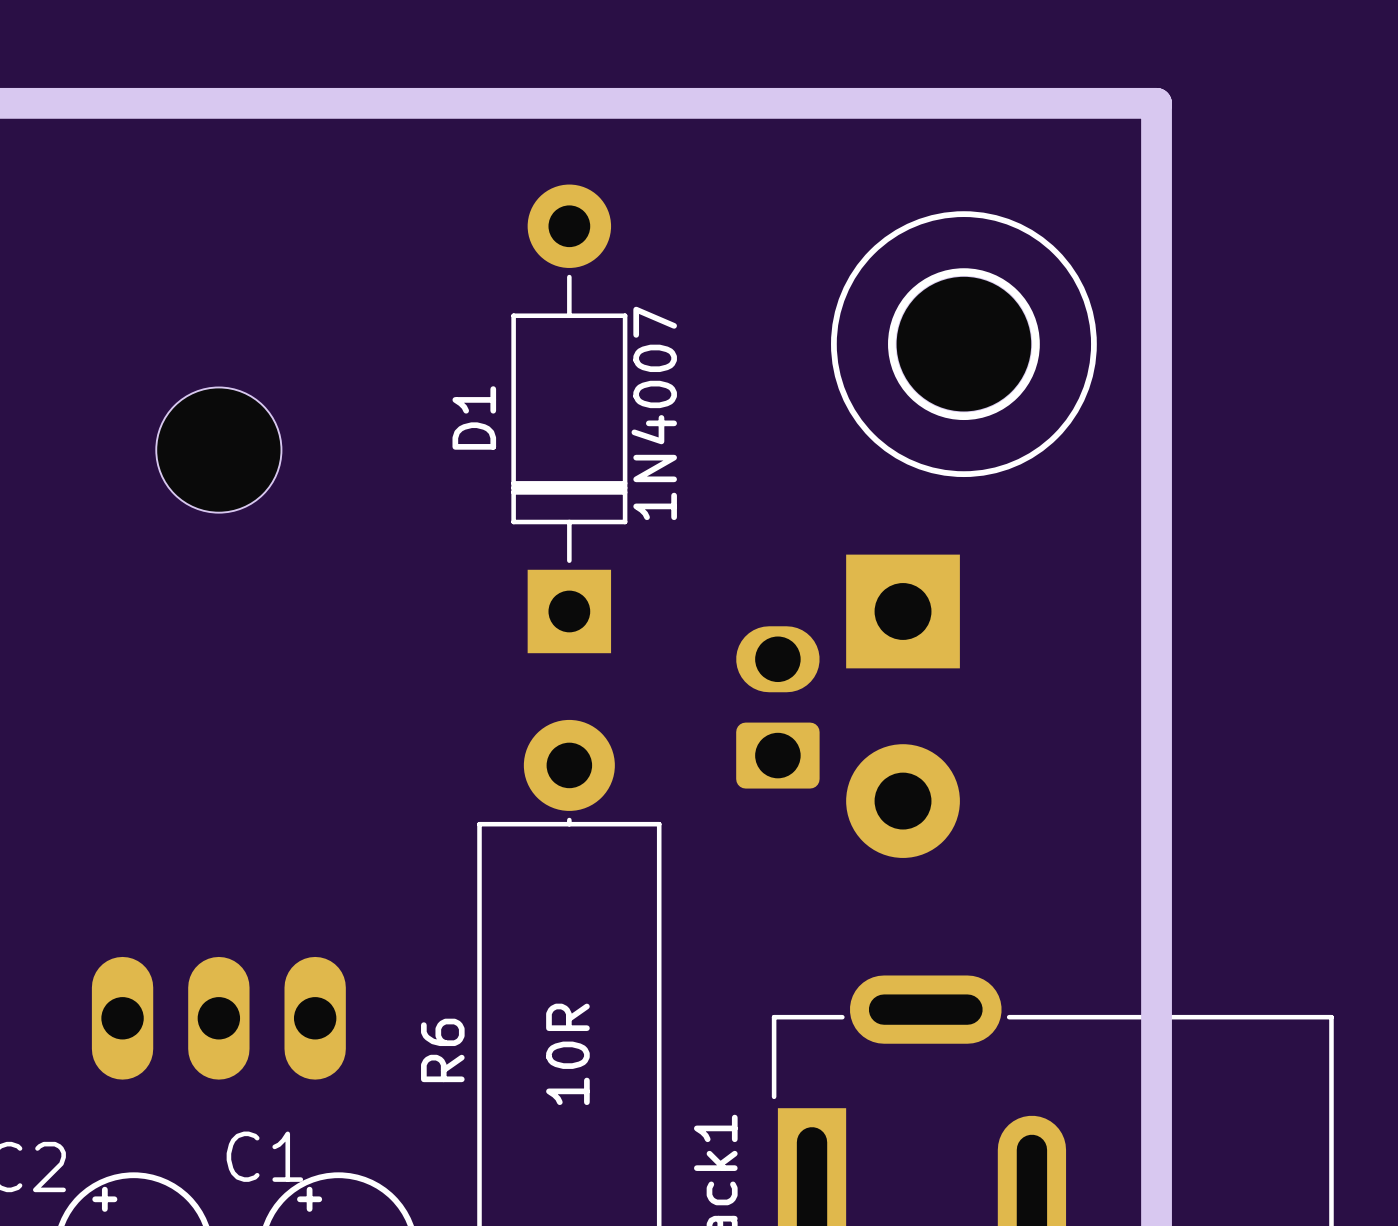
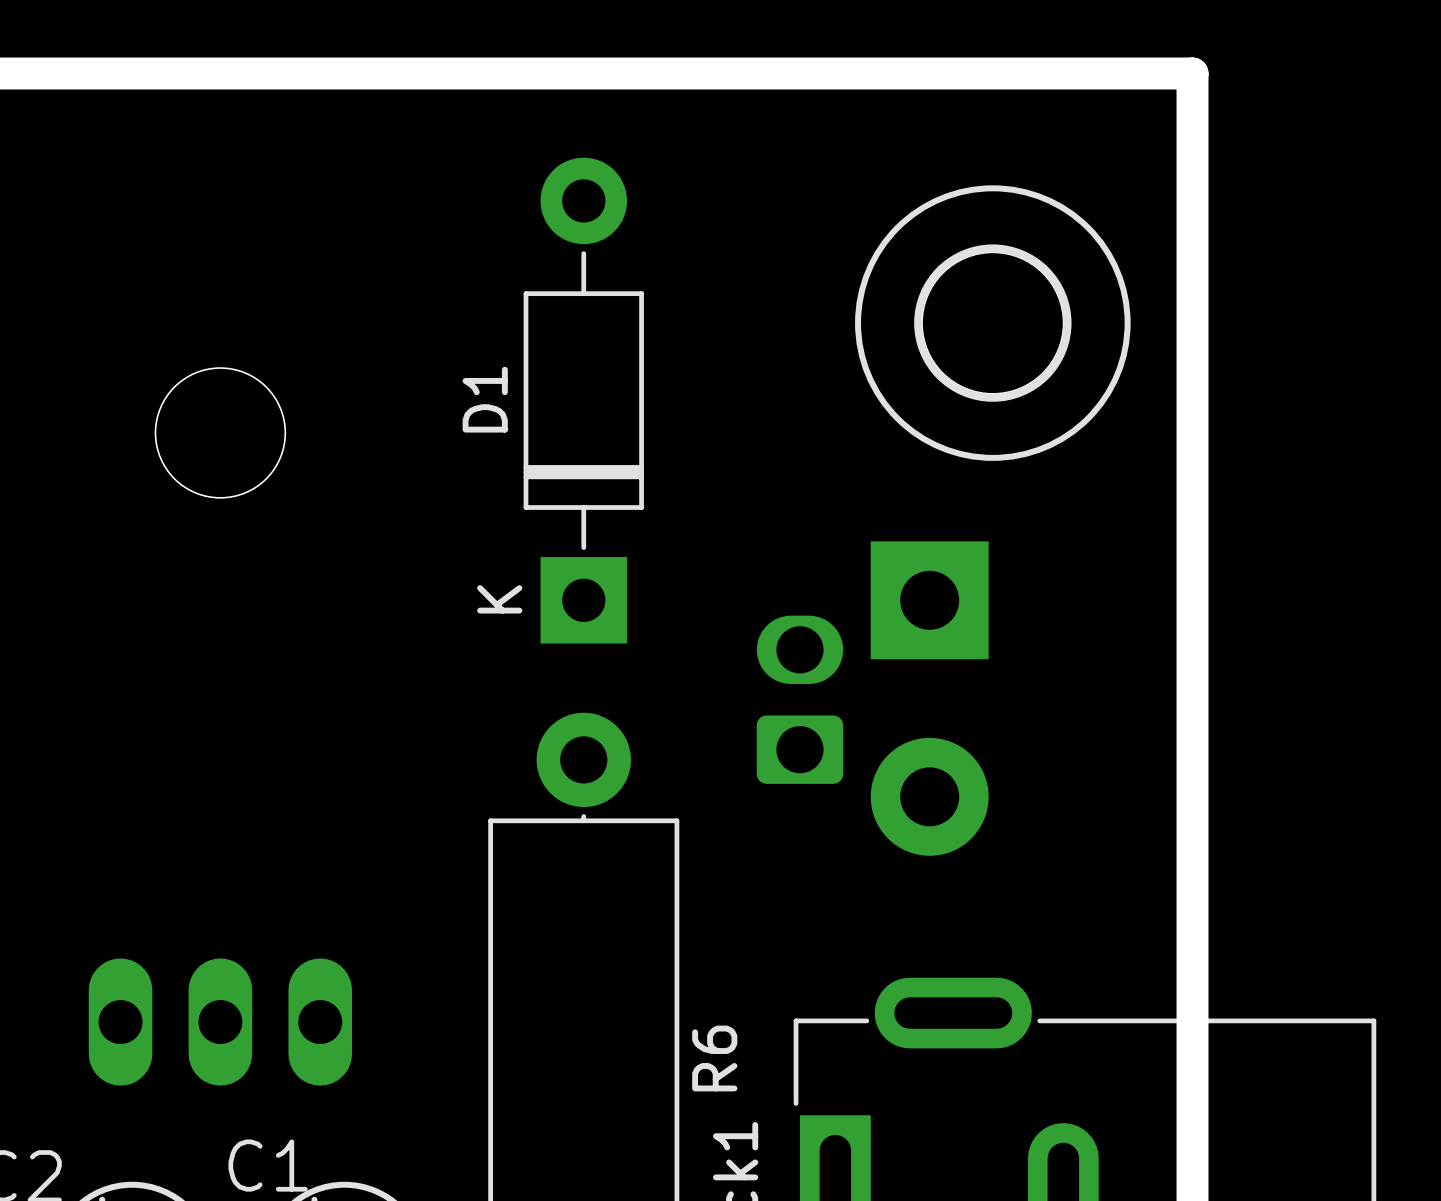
D1 value: 1N4007 (654, 413) -> none
D1 text: none -> K (499, 599)
R6 name position: R6 (442, 1050) -> R6 (714, 1058)
R6 value: 10R (567, 1054) -> none

